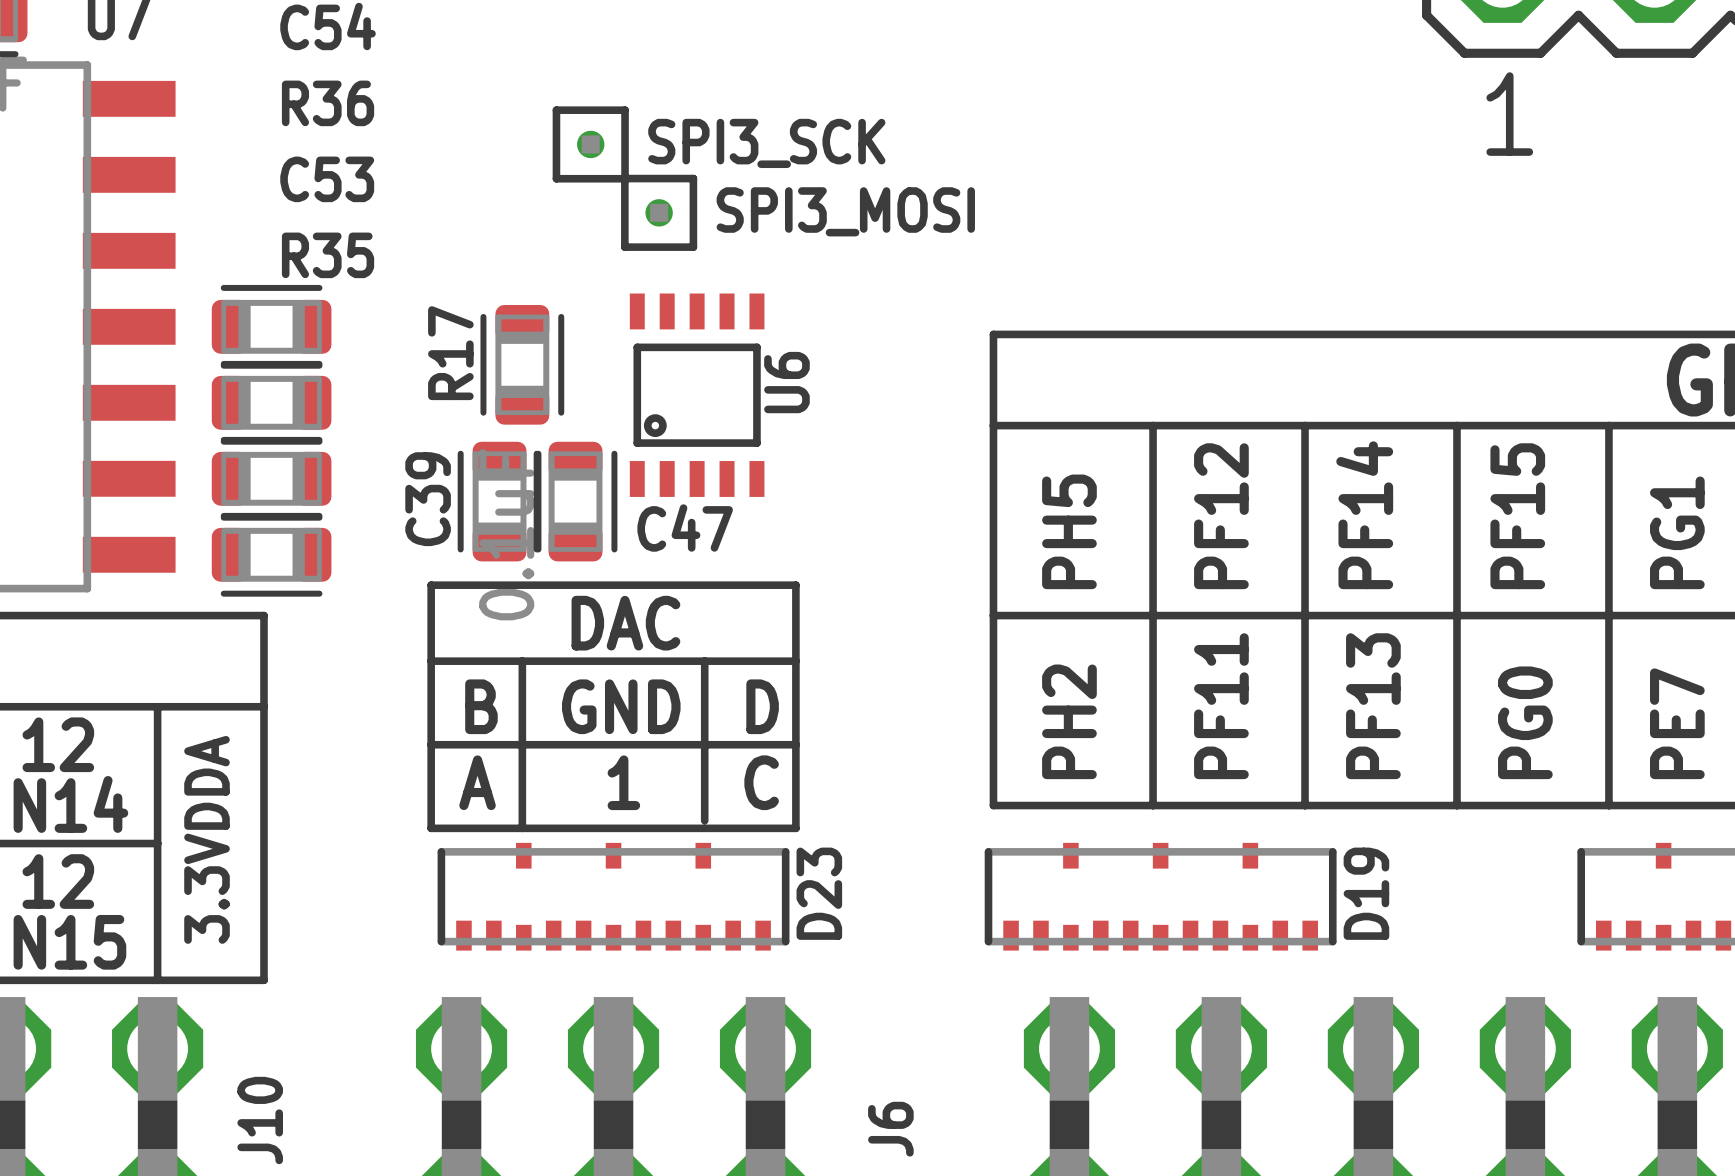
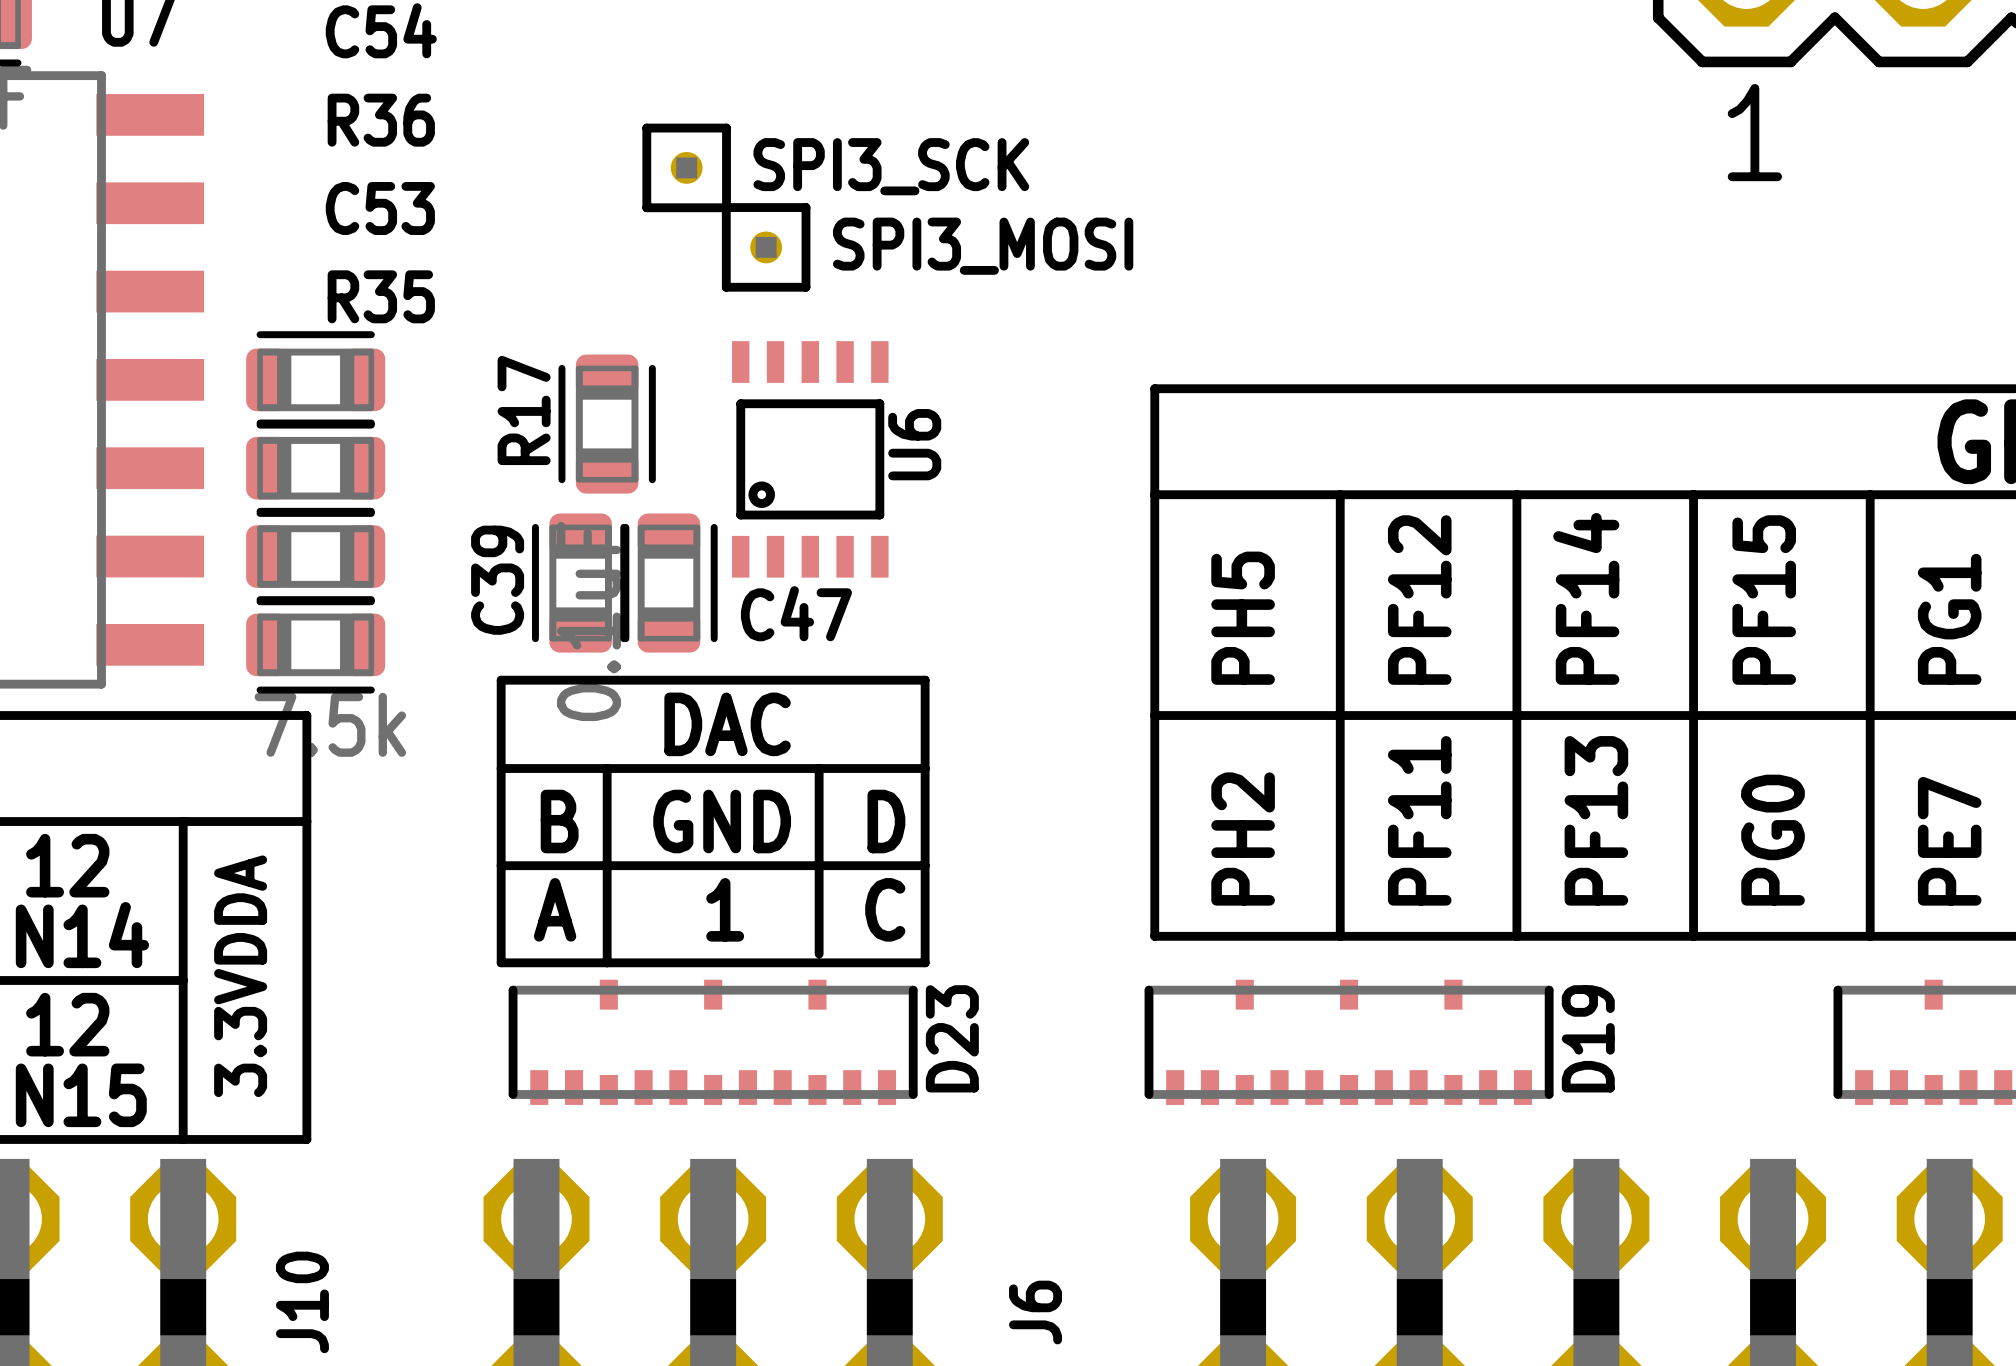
R35 value: none -> 7.5k (330, 724)

